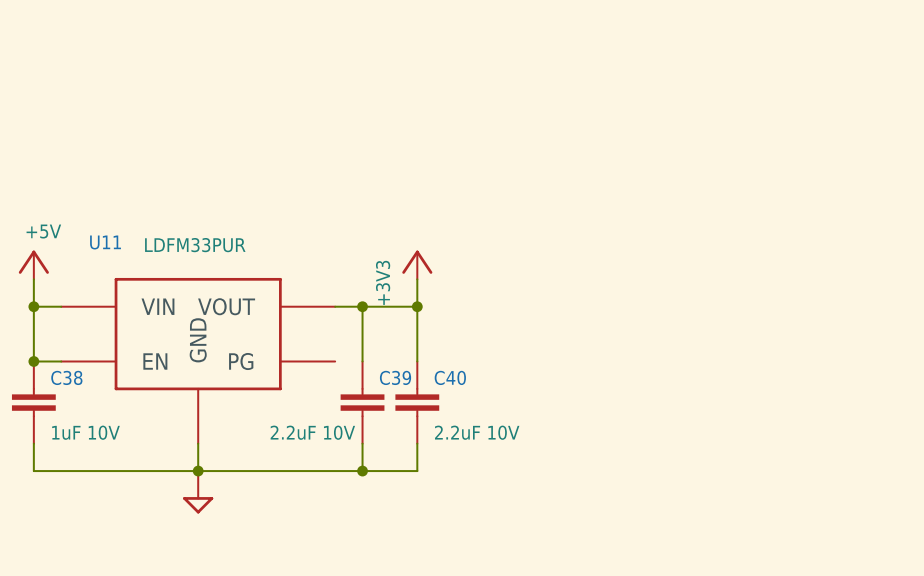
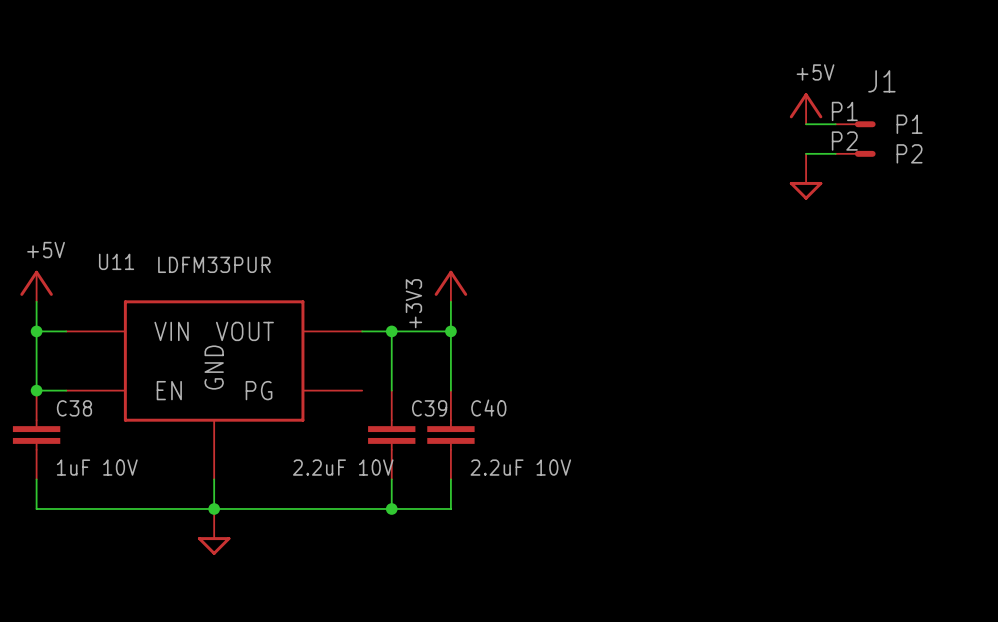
power symbol: none -> +5V (806, 108)
wire: none -> (806, 124) (835, 124)
J1: none -> (855, 139)
wire: none -> (806, 153) (835, 153)
power symbol: none -> (806, 176)

